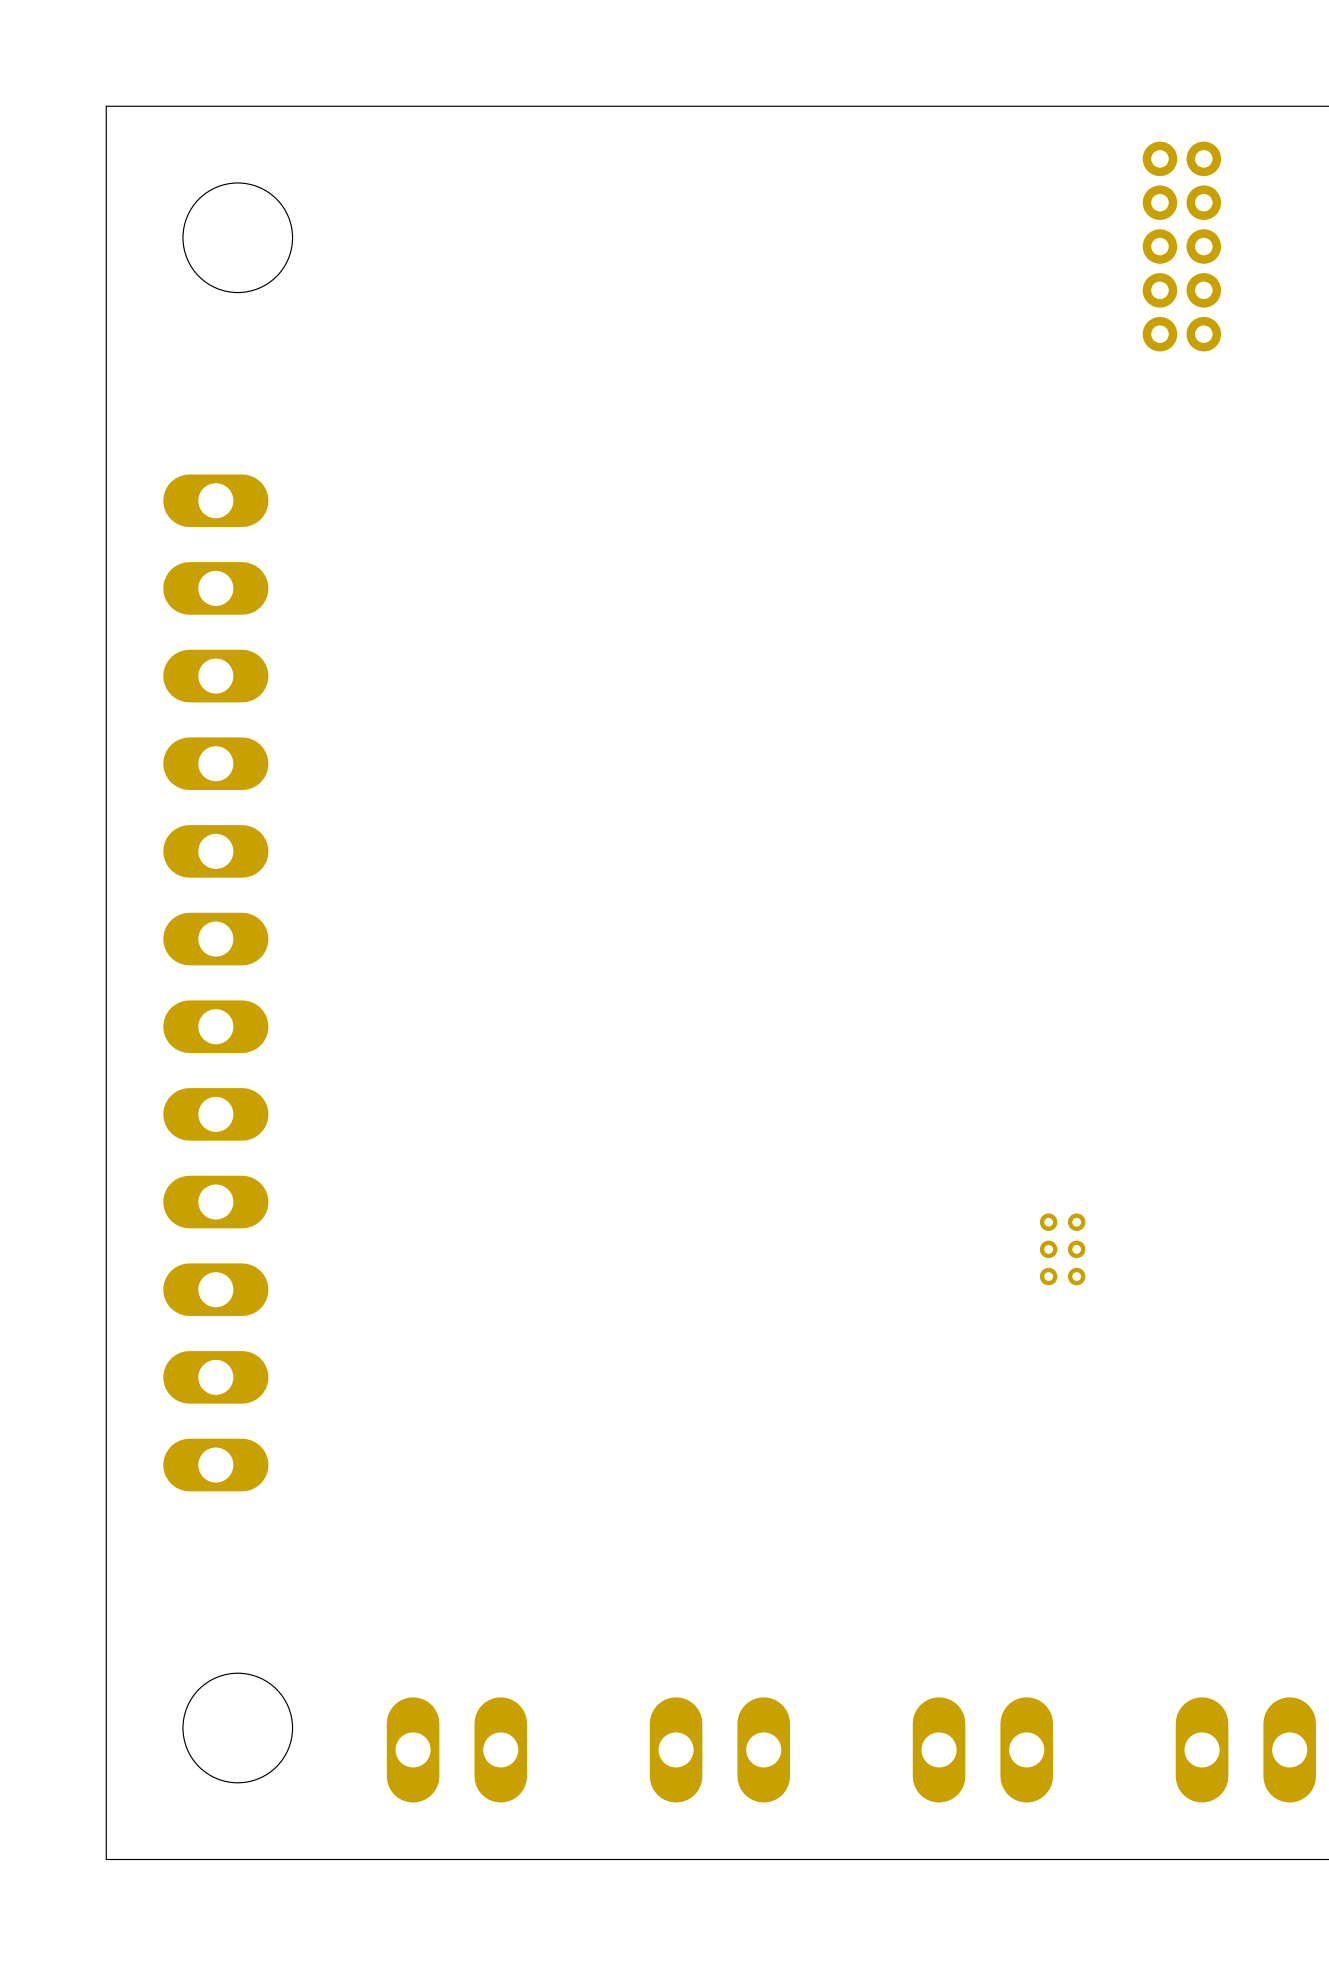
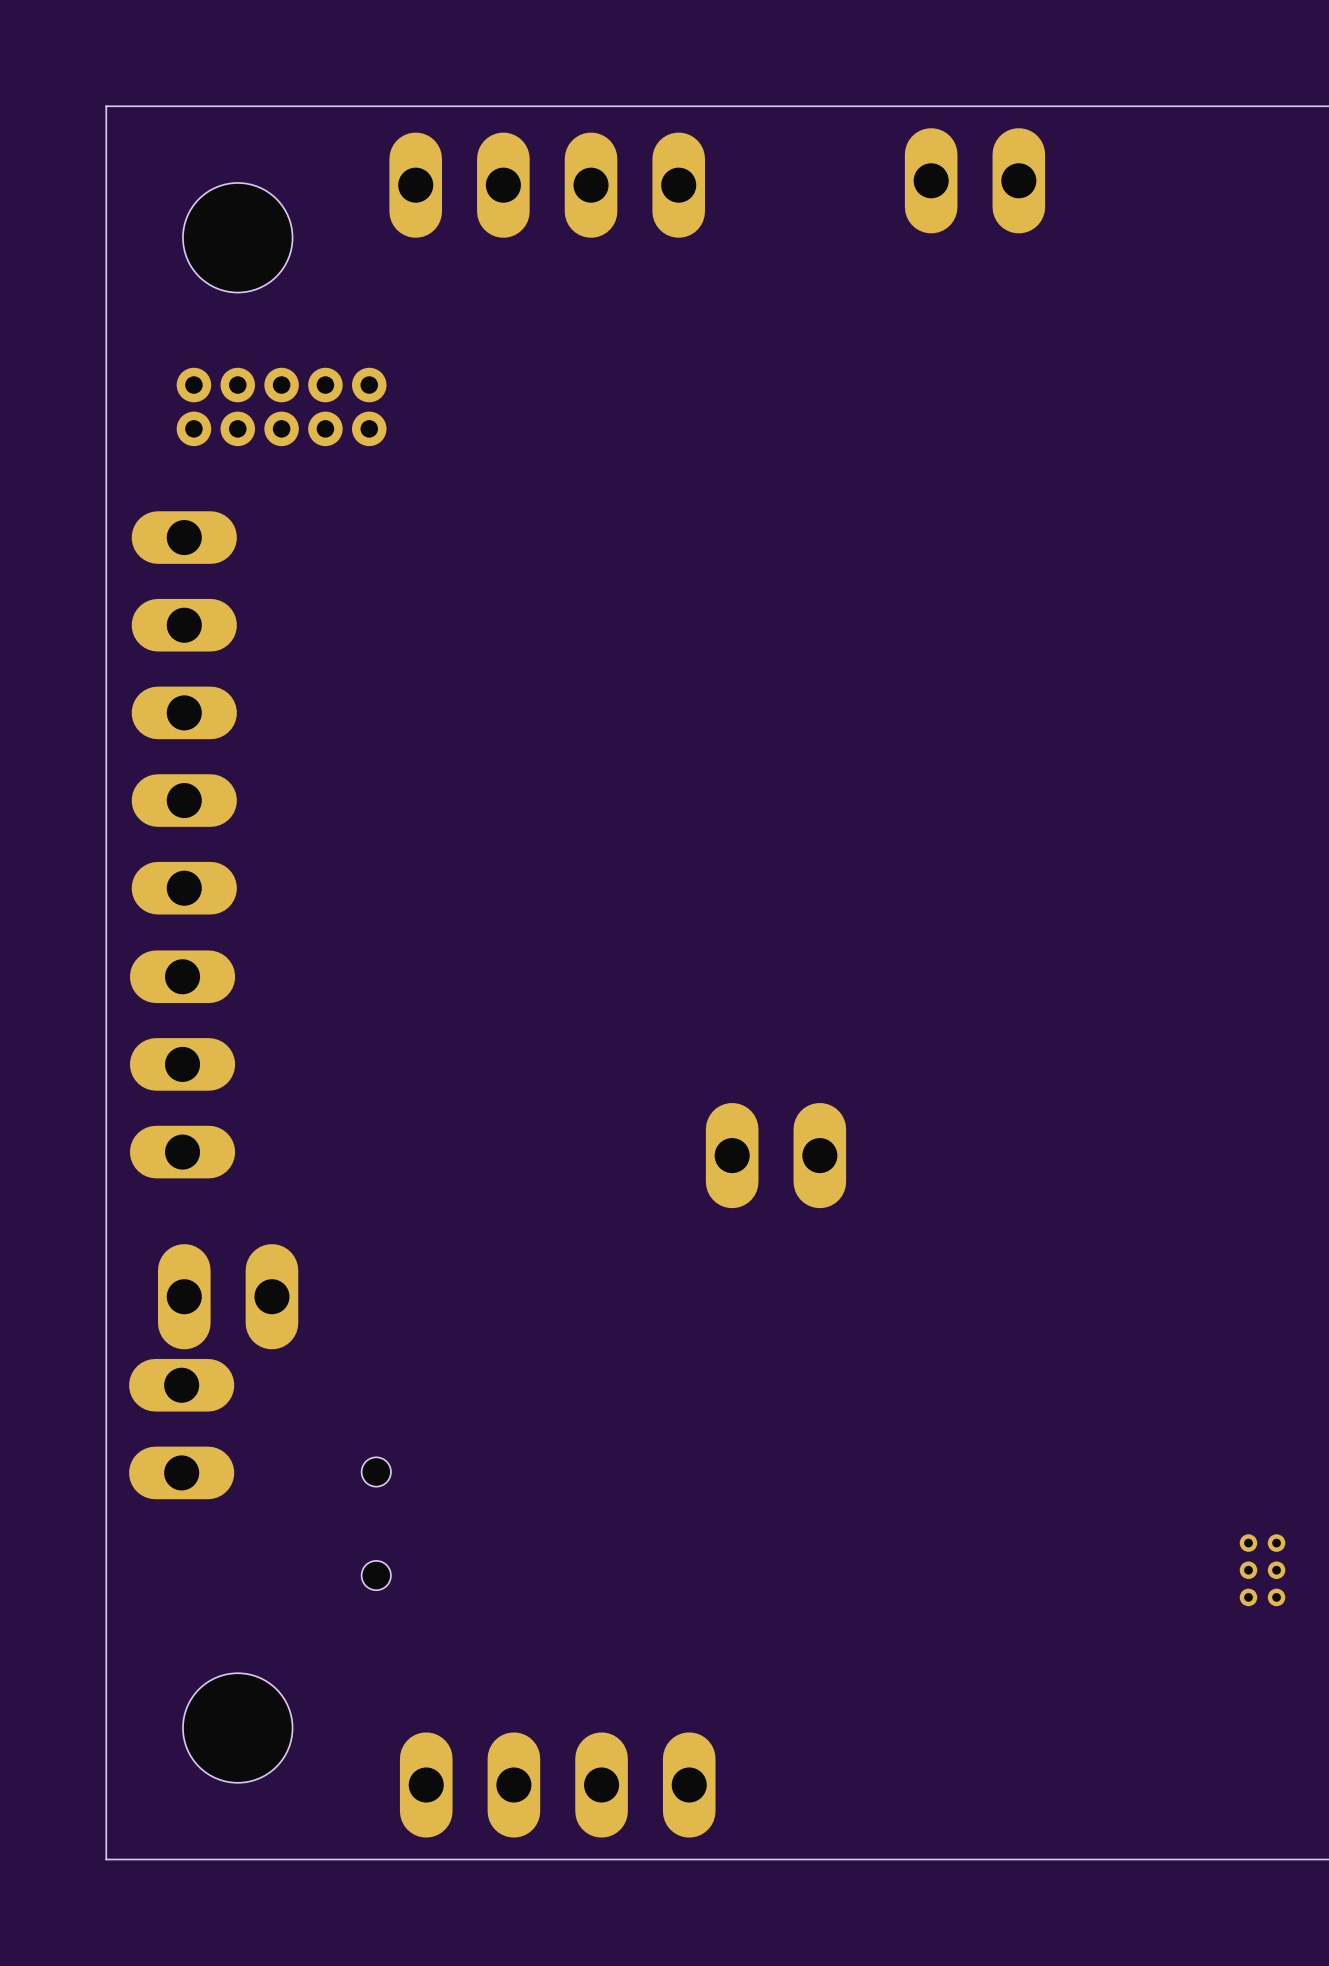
part: none -> (975, 180)
part: (1181, 246) -> none
part: none -> (281, 406)
part rotation: 0° (215, 632) -> 90° clockwise (547, 185)
part position: (215, 632) -> (547, 185)
part: none -> (184, 712)
part position: (215, 939) -> (182, 1064)
part footprint: [163, 1088, 269, 1492] -> [157, 1244, 299, 1350]
part: none -> (776, 1155)
part position: (1062, 1249) -> (1262, 1570)
part: none -> (181, 1429)
part: none -> (376, 1523)
part position: (456, 1749) -> (470, 1784)
part position: (719, 1749) -> (645, 1784)
part: (982, 1749) -> none
part: (1245, 1749) -> none

